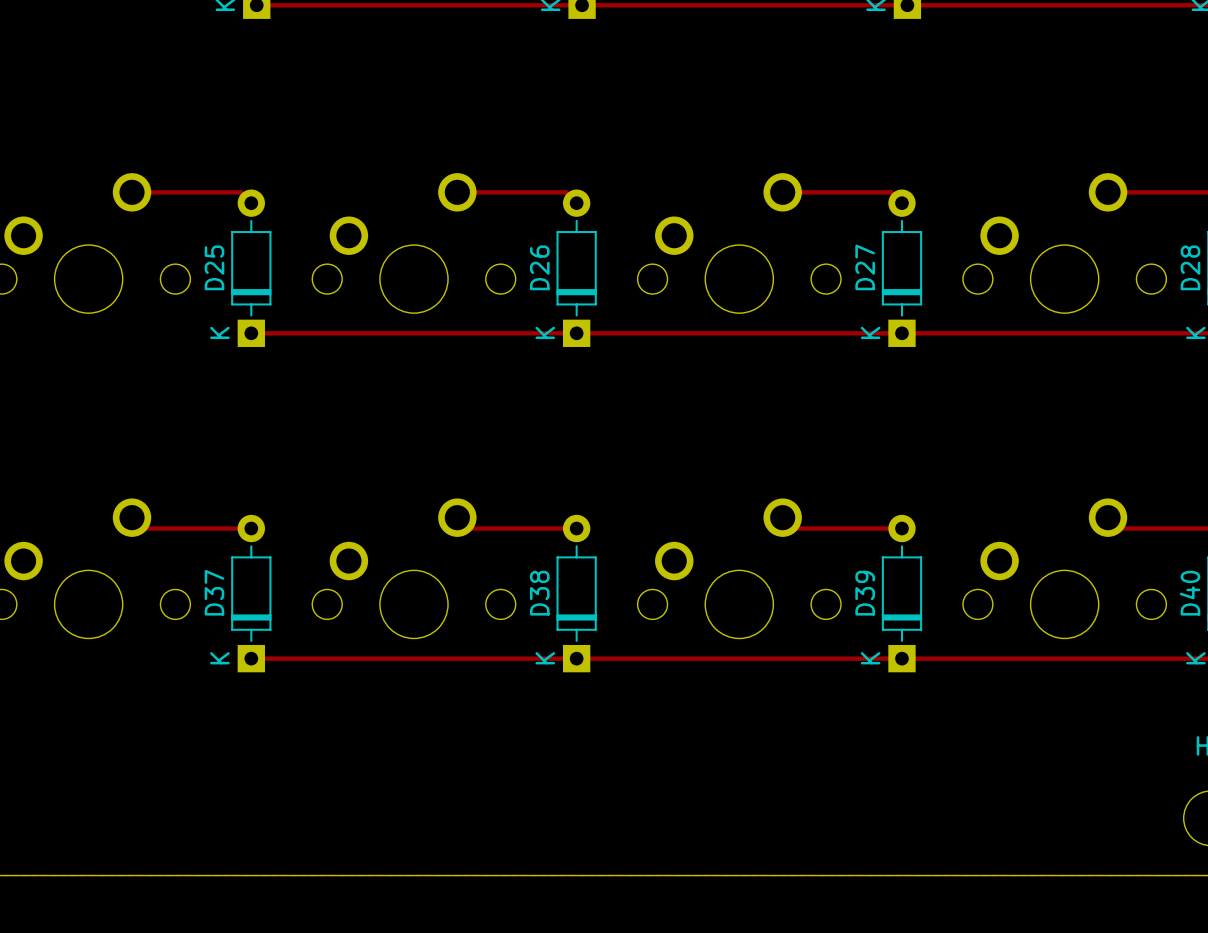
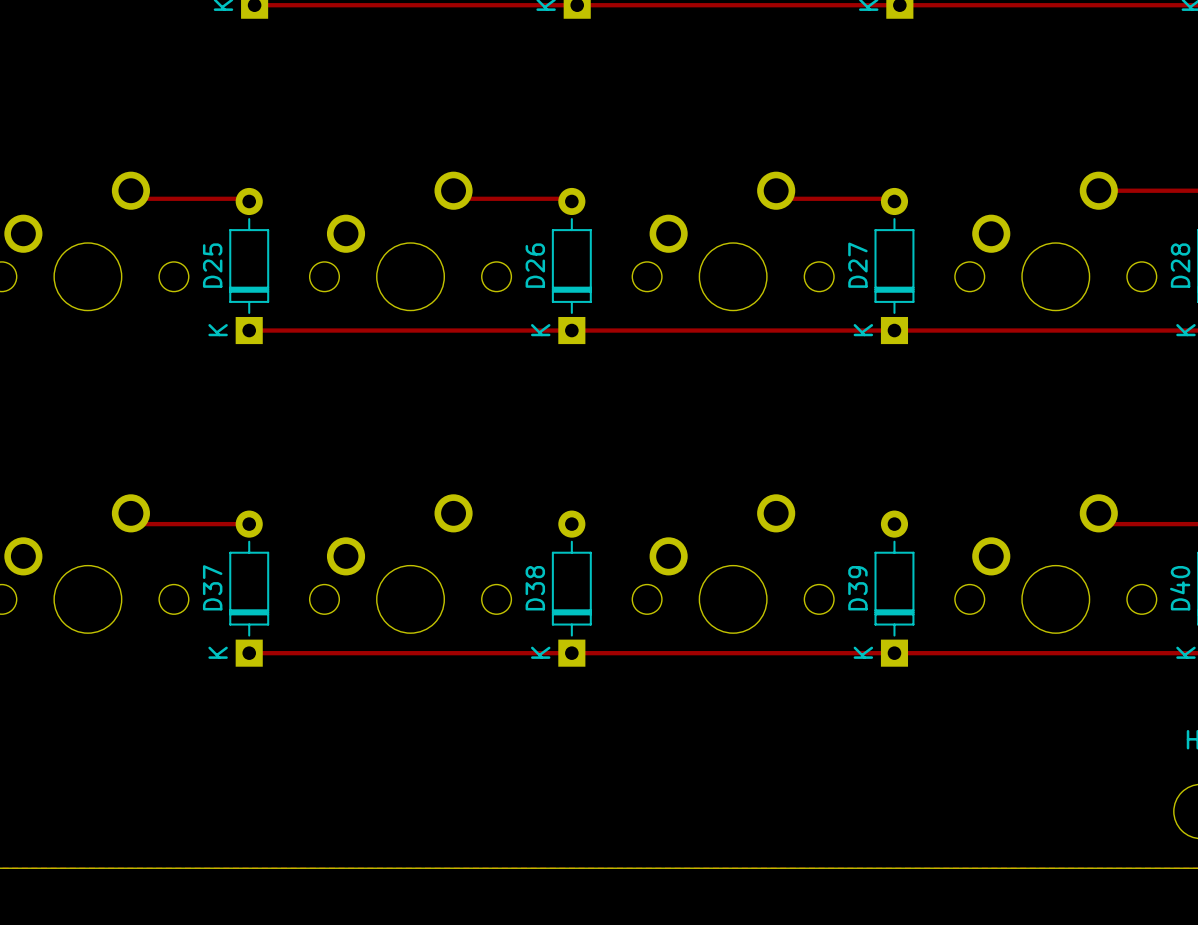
track: (132, 192) (240, 192) (251, 203) -> none
track: (457, 192) (565, 192) (576, 203) -> none
track: (782, 192) (891, 192) (901, 203) -> none
track: none -> (133, 196) (136, 198) (254, 198)
track: none -> (458, 195) (461, 198) (577, 198)
track: none -> (780, 196) (782, 198) (899, 198)
track: (457, 517) (468, 528) (576, 528) -> none
track: (782, 517) (793, 528) (901, 528) -> none

